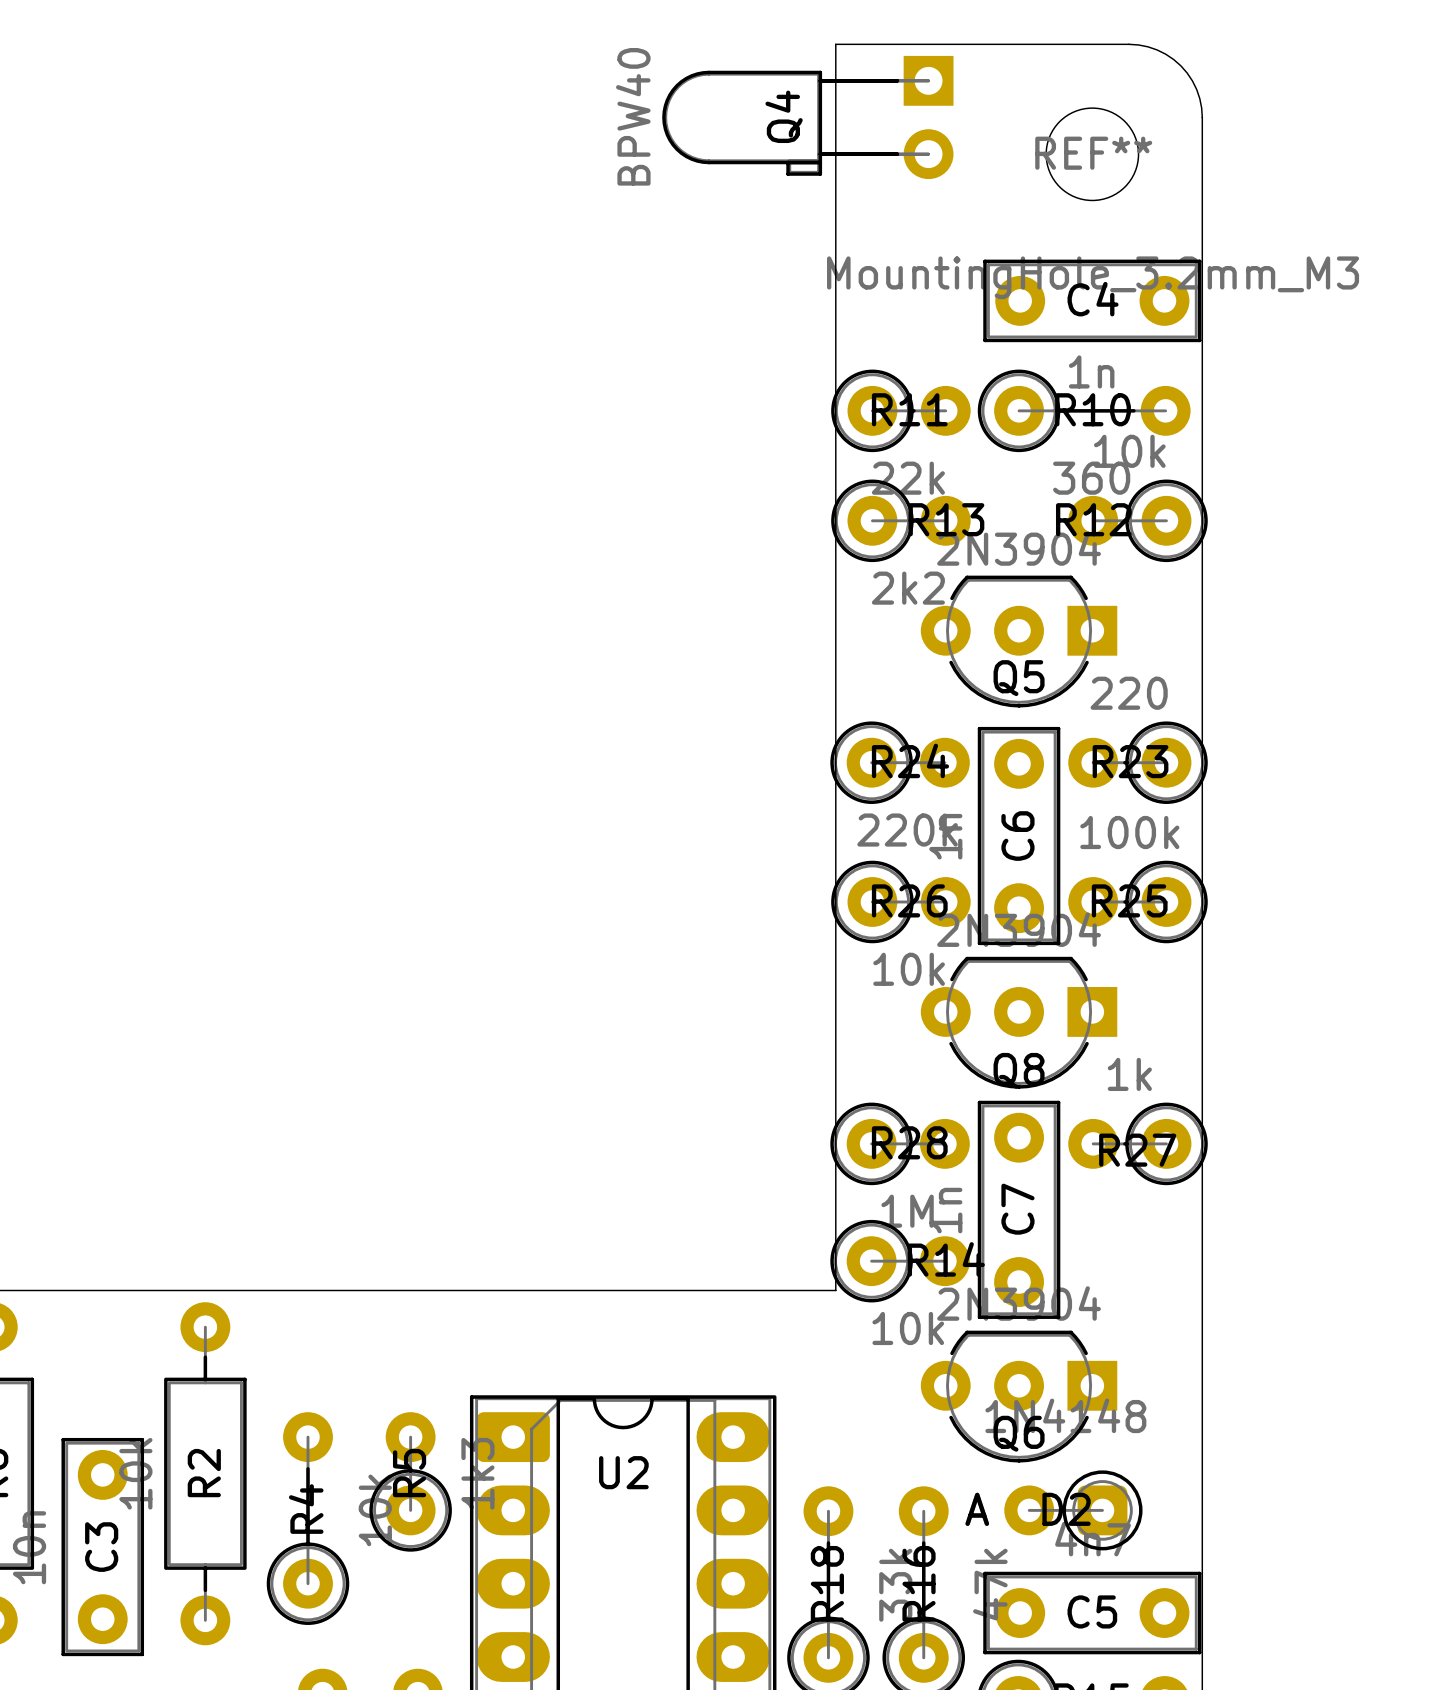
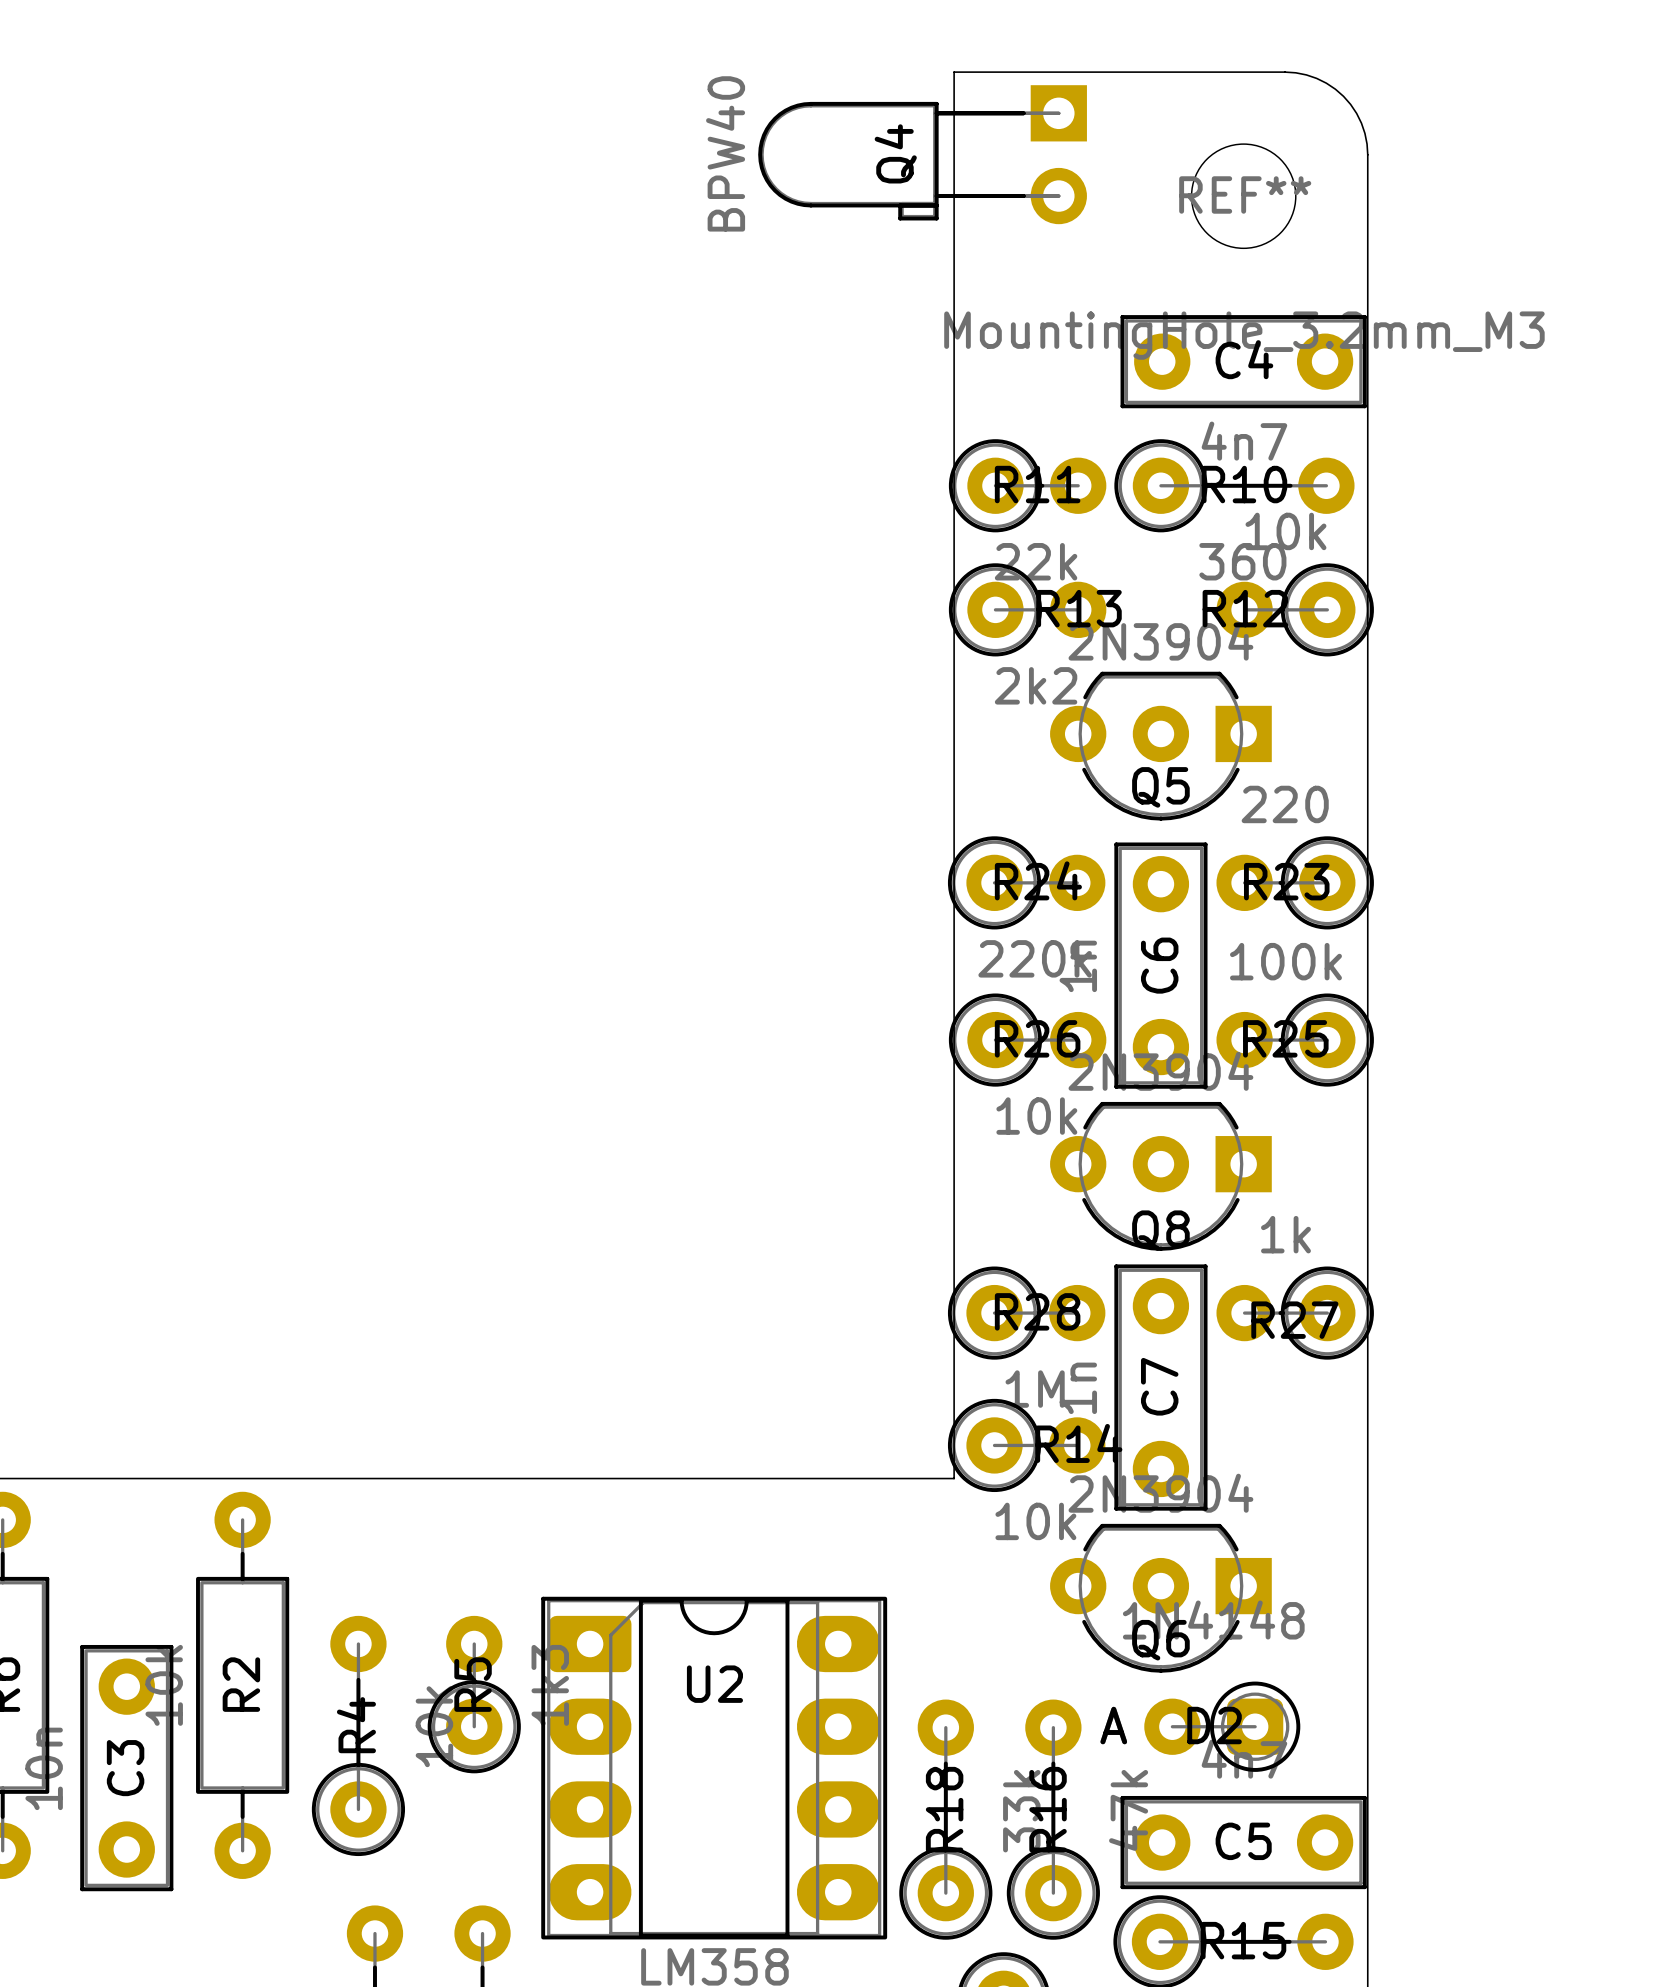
C4 value: 1n (1091, 371) -> 4n7 (1244, 441)

